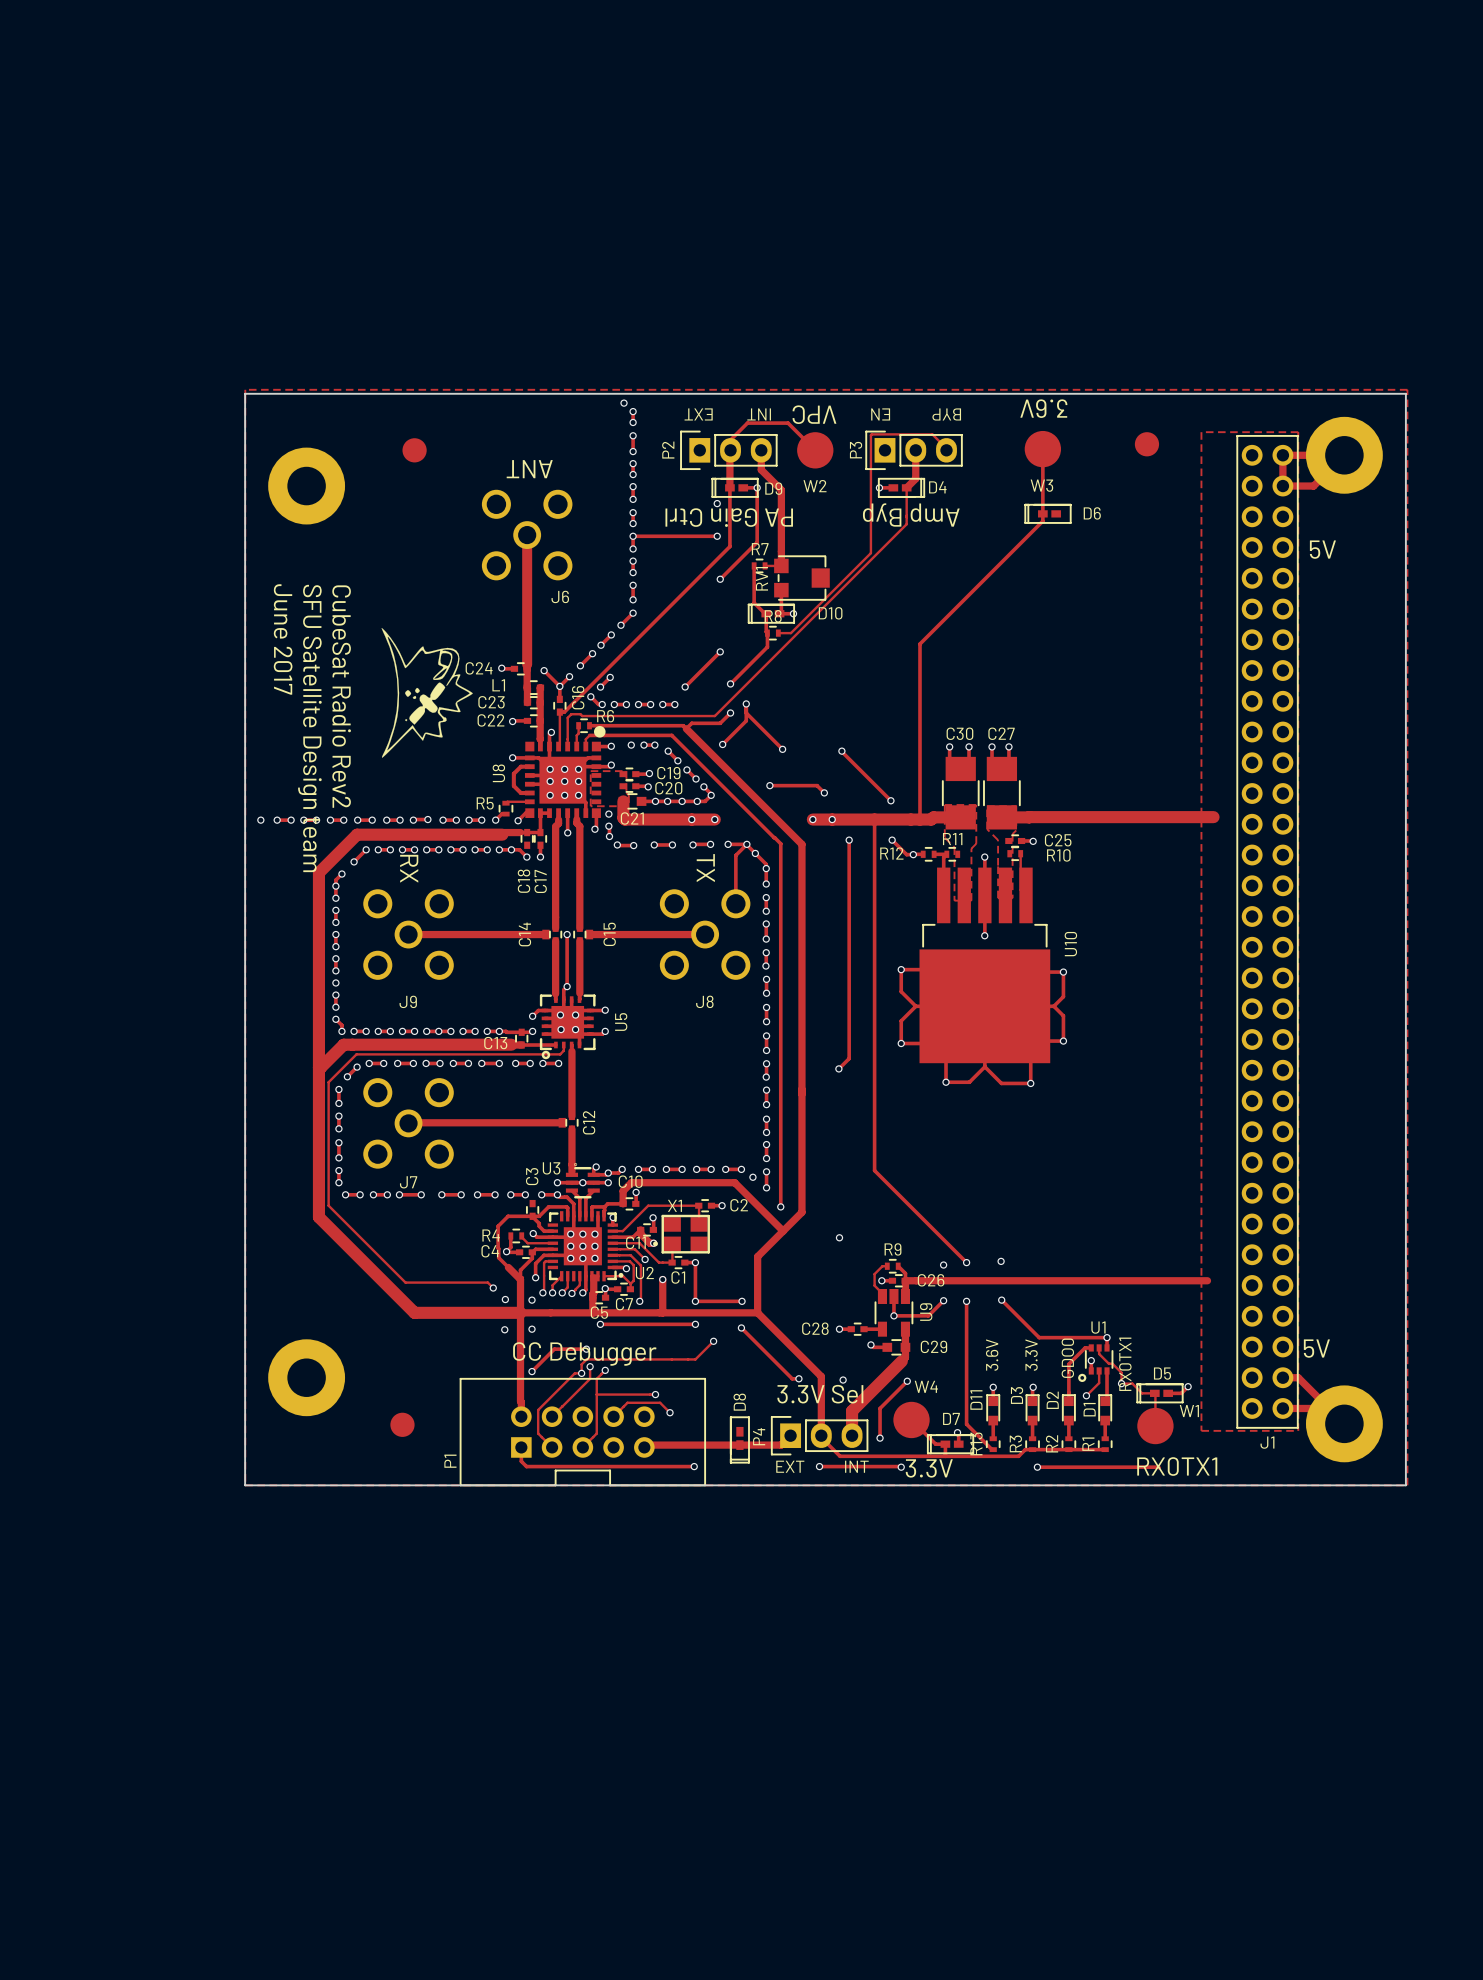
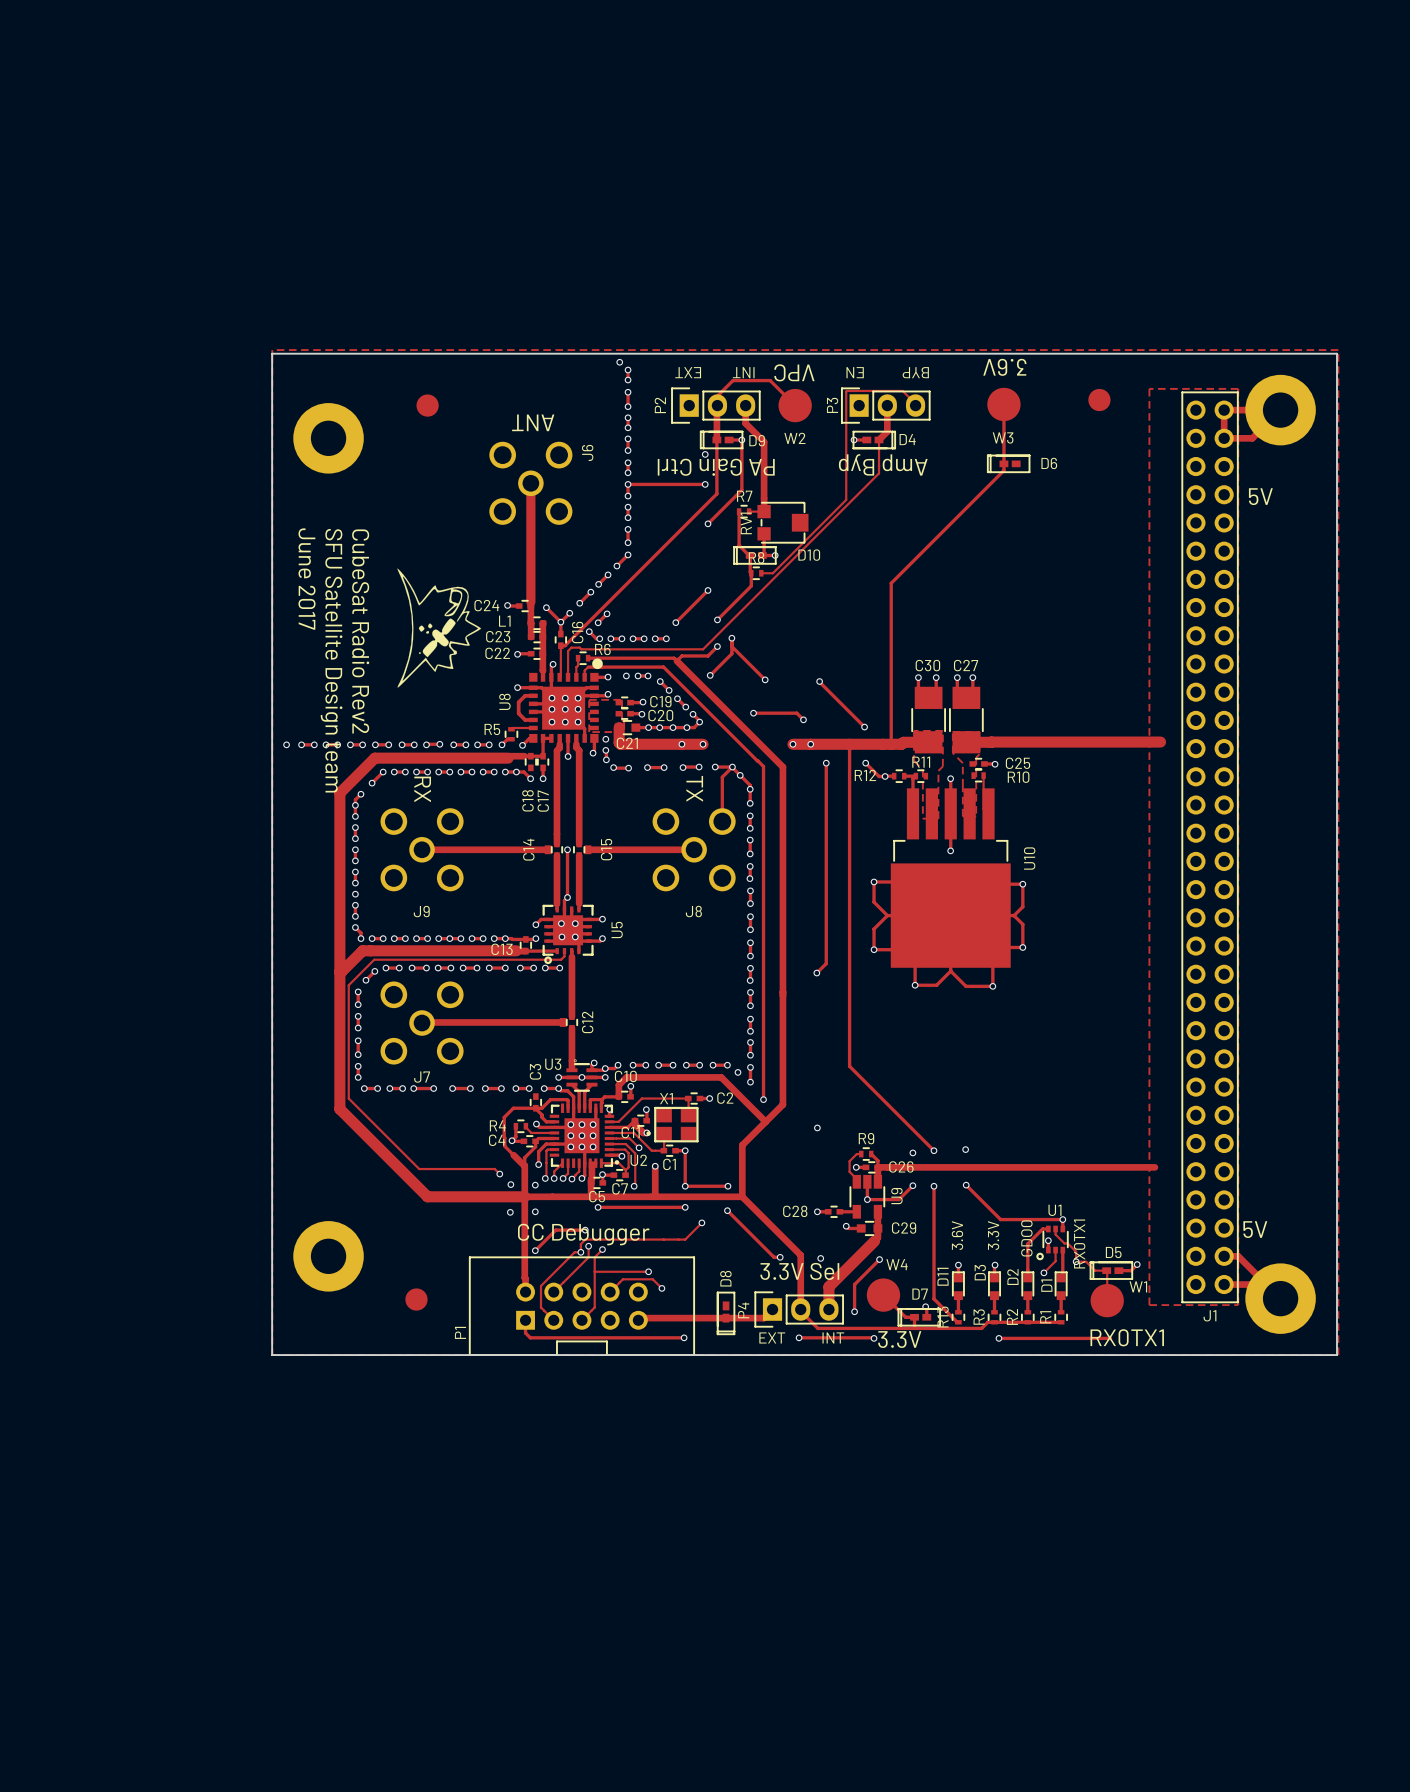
J6 name rotation: 0° (560, 596) -> 90° counterclockwise (587, 452)
J6 name position: J6 (560, 596) -> J6 (587, 452)

